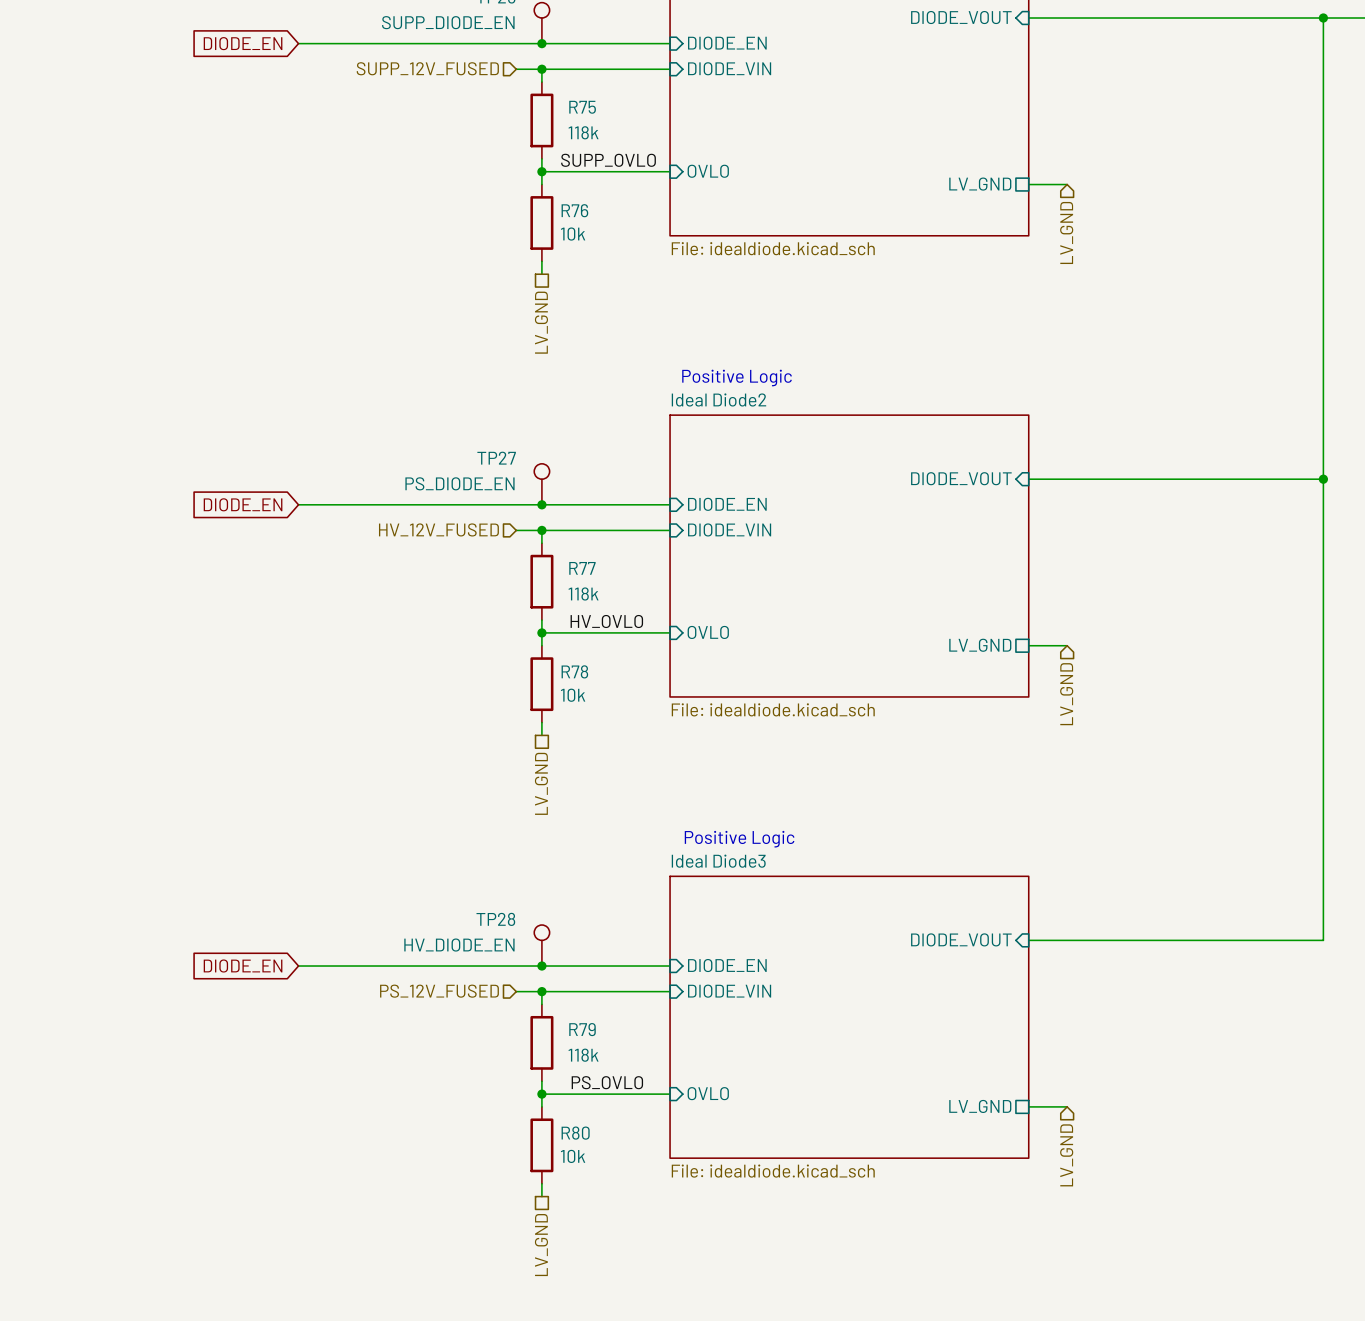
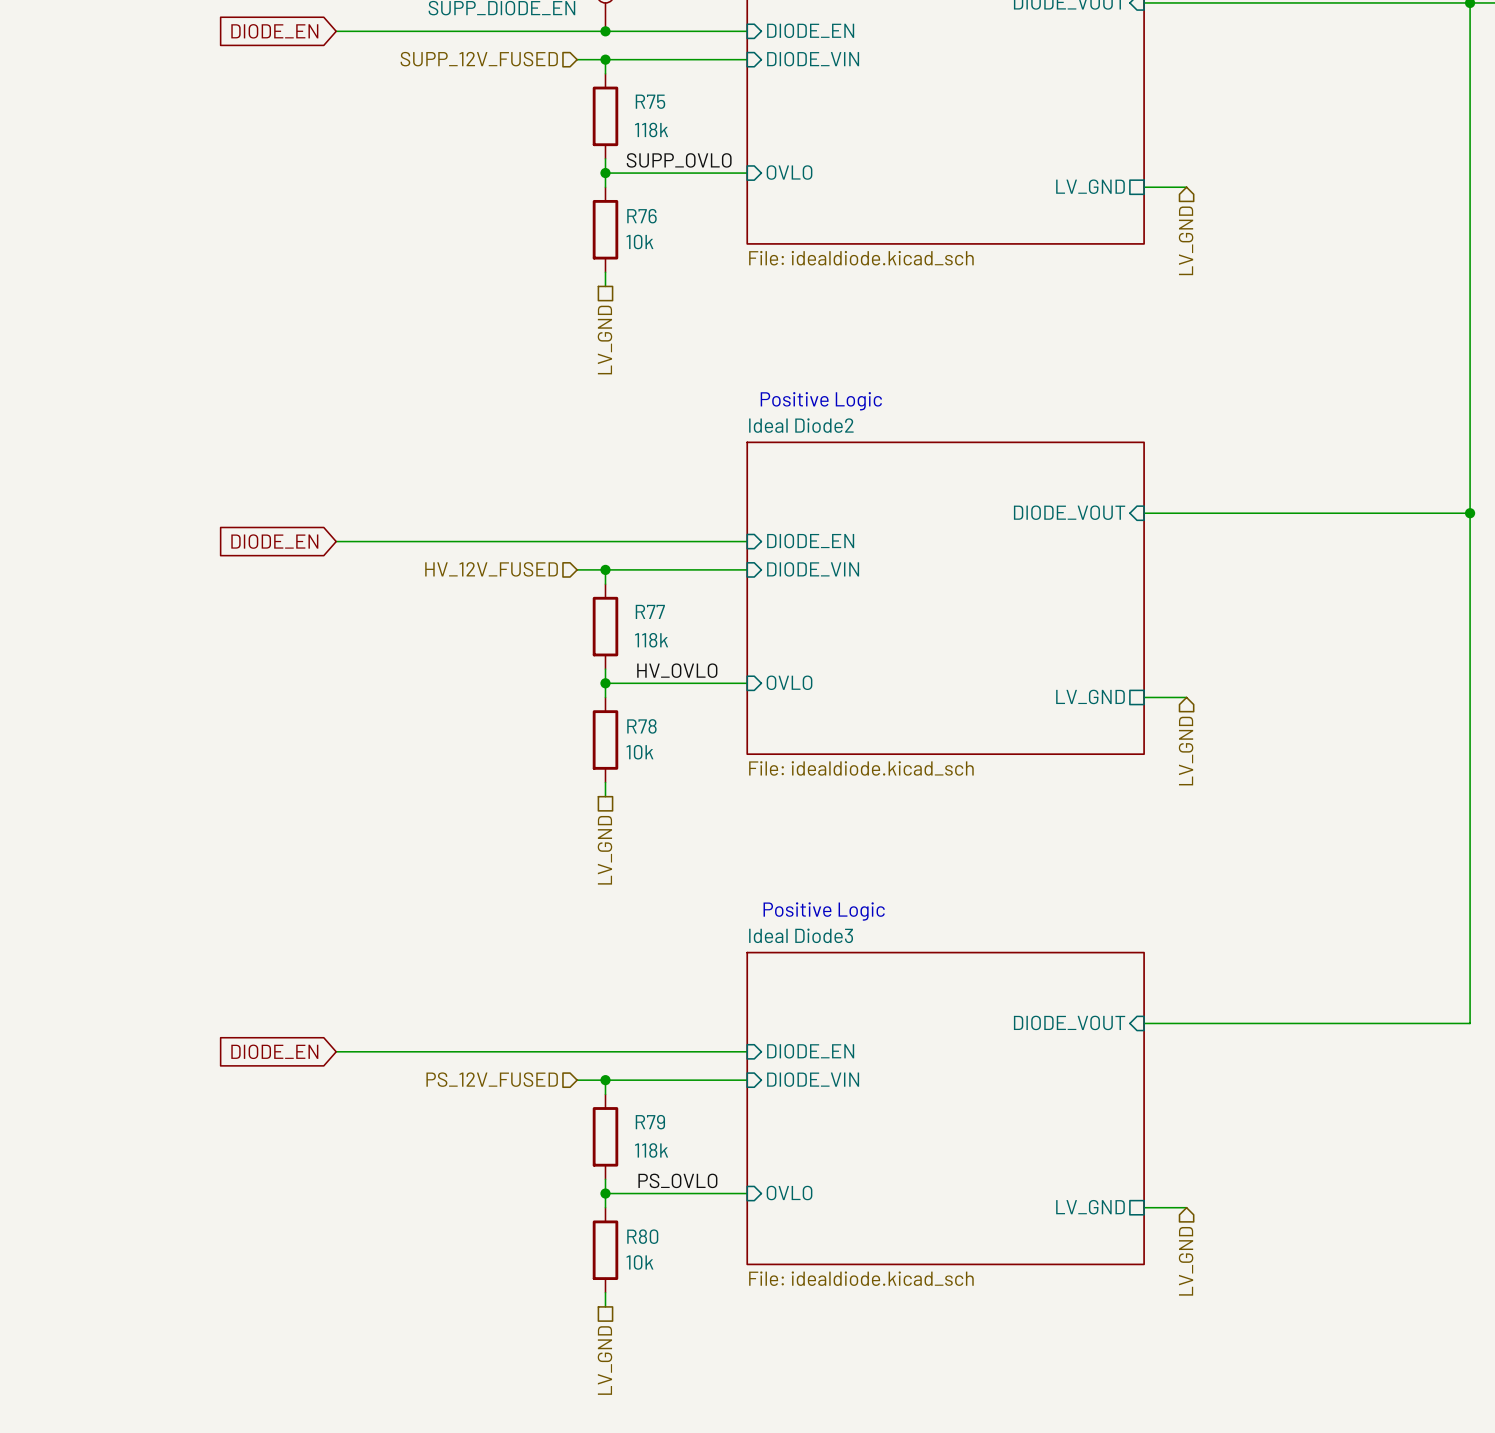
TP27: PS_DIODE_EN (541, 484) -> none
junction: (541, 504) -> none
TP28: HV_DIODE_EN (541, 945) -> none
junction: (541, 966) -> none

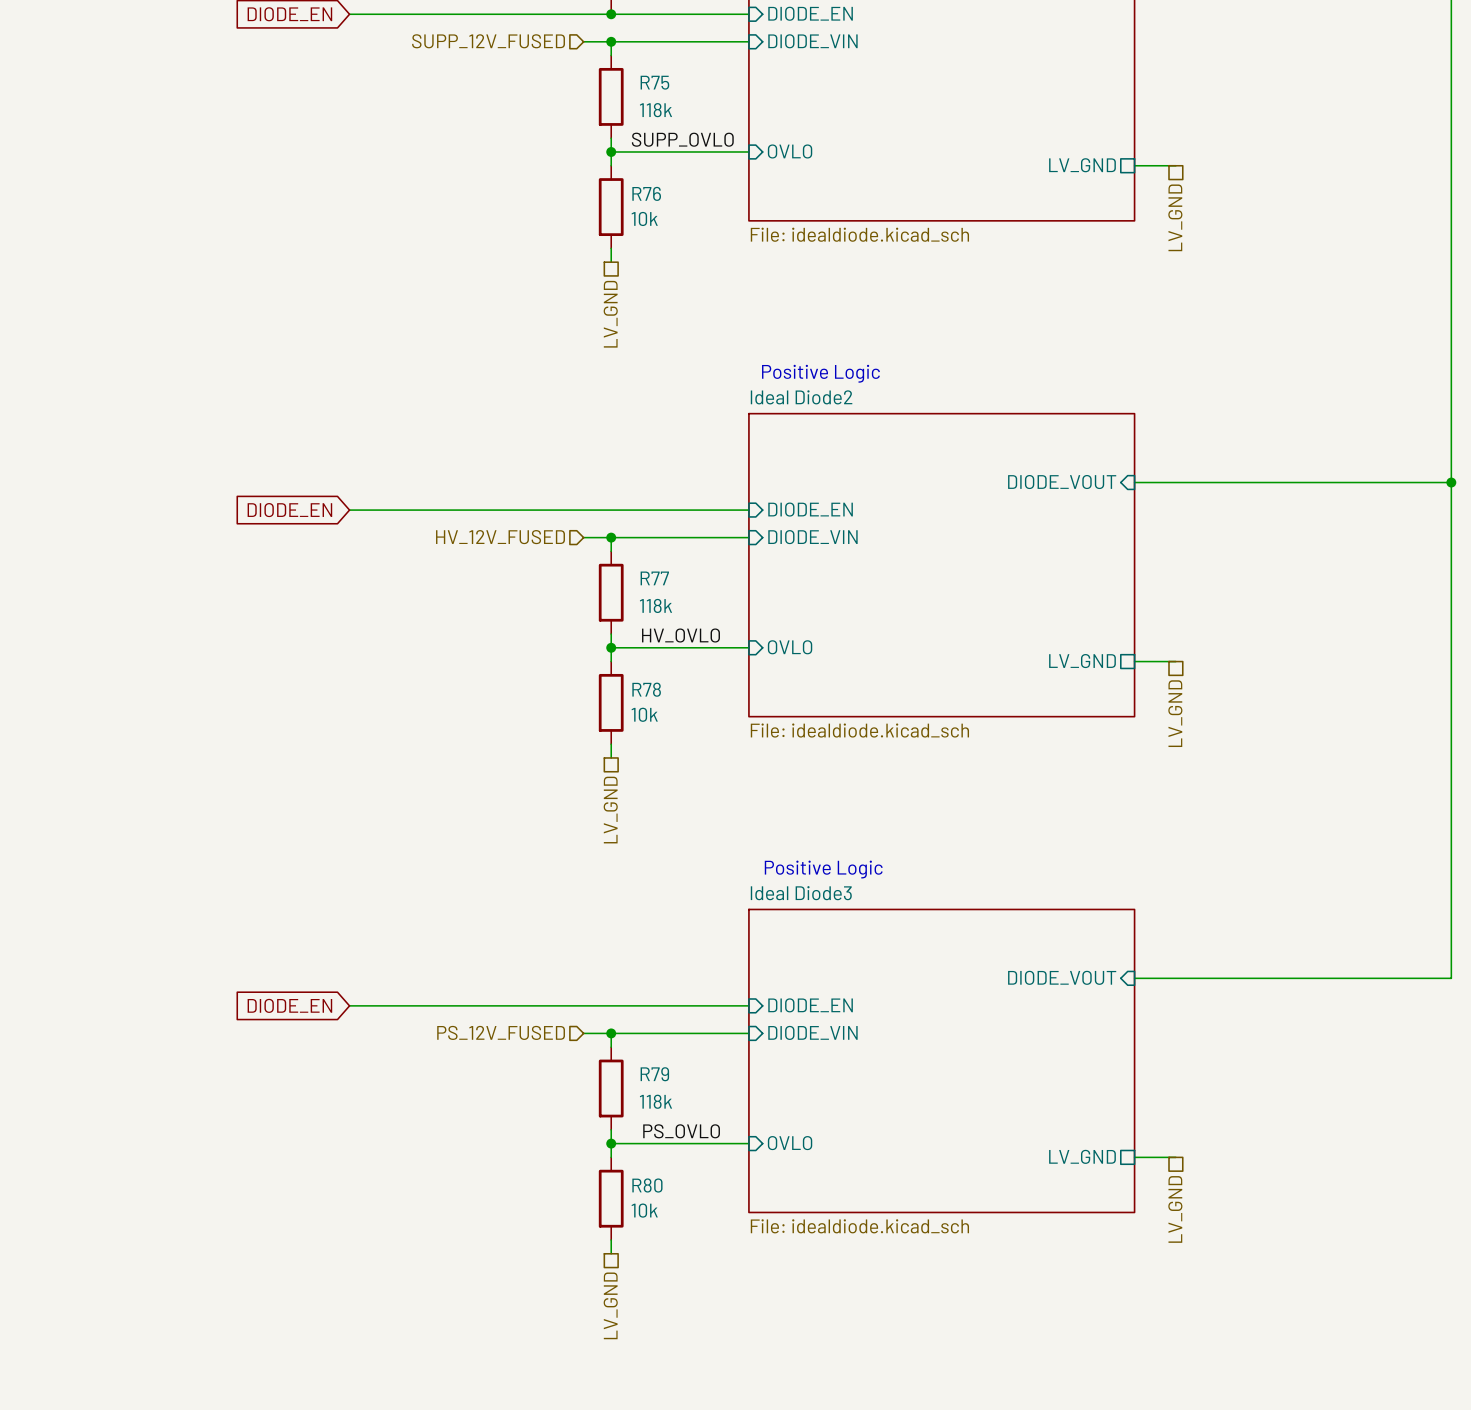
hierarchical label shape: input (1186, 240) -> passive (1175, 217)
hierarchical label shape: input (1186, 751) -> passive (1175, 713)
hierarchical label shape: input (1186, 1261) -> passive (1175, 1209)

